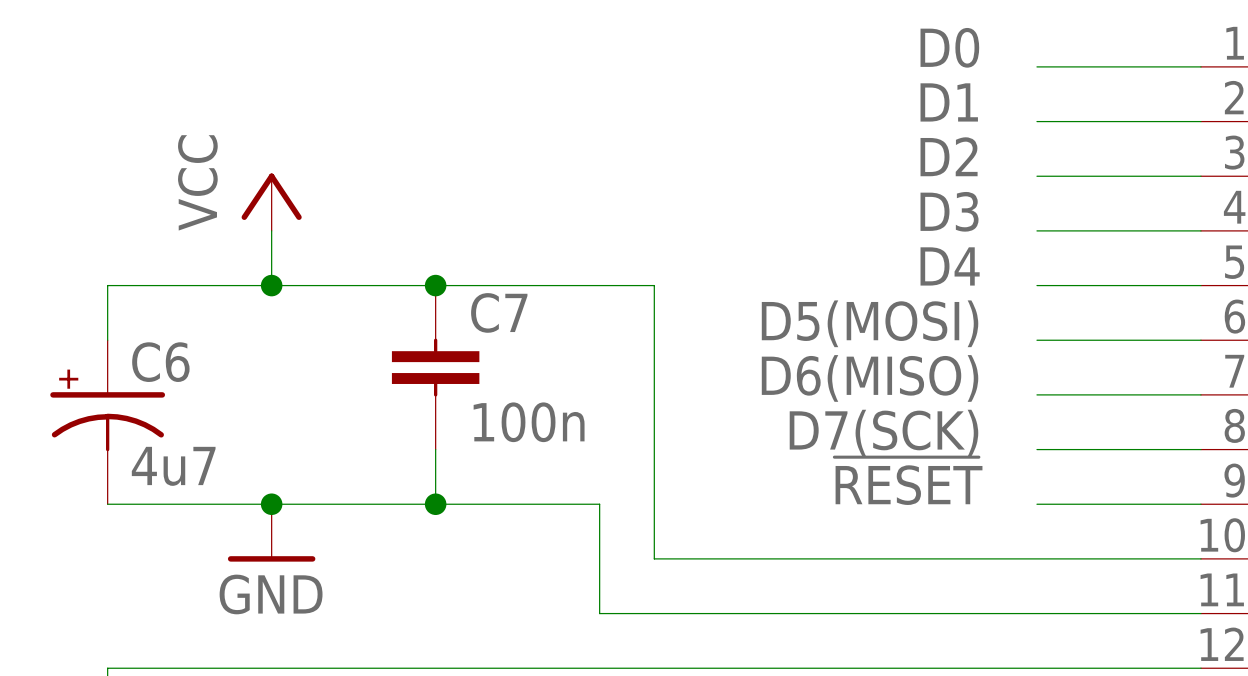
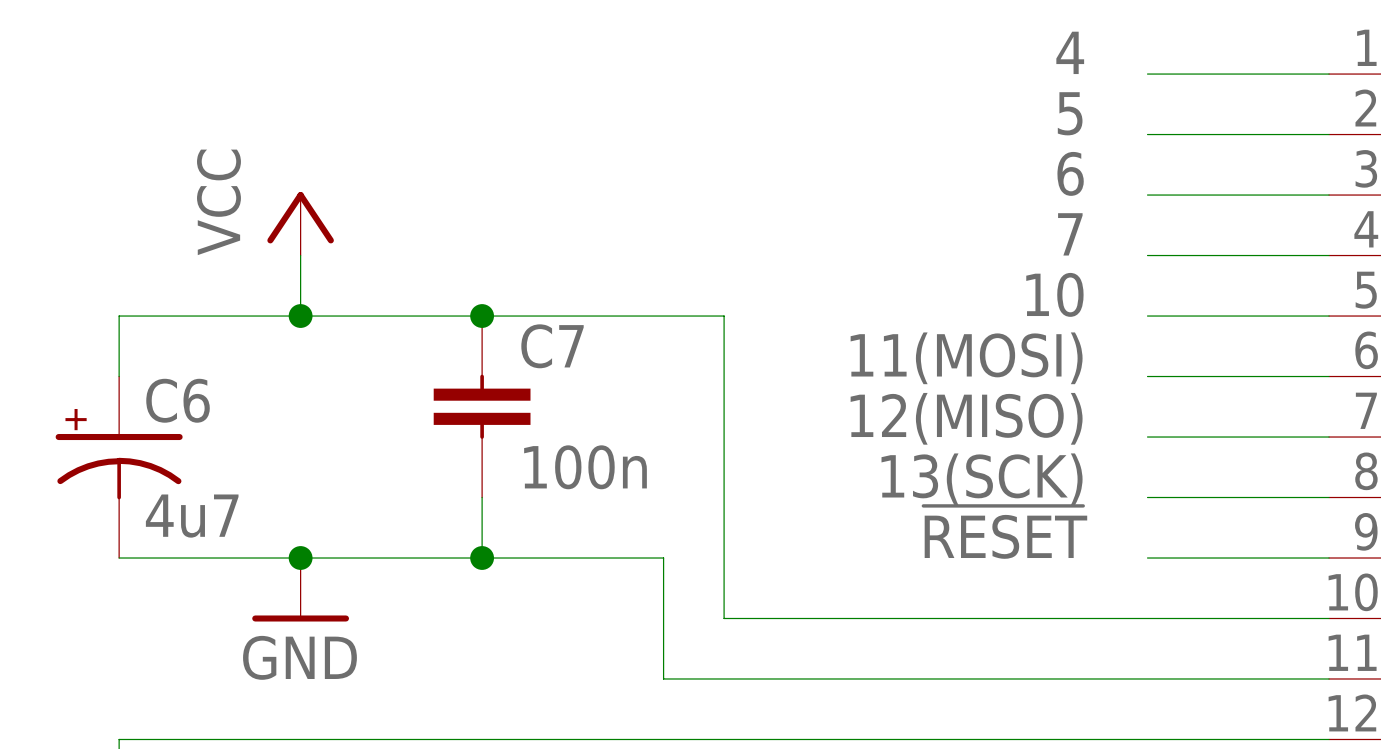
label: D0 (949, 47) -> 4 (1070, 52)
label: D1 (949, 102) -> 5 (1070, 113)
label: D2 (949, 156) -> 6 (1070, 173)
label: D3 (949, 211) -> 7 (1070, 234)
label: D4 (950, 266) -> 10 (1054, 294)
label: D5(MOSI) (870, 323) -> 11(MOSI) (966, 358)
label: D6(MISO) (870, 378) -> 12(MISO) (966, 418)
label: D7(SCK) (883, 433) -> 13(SCK) (982, 479)

